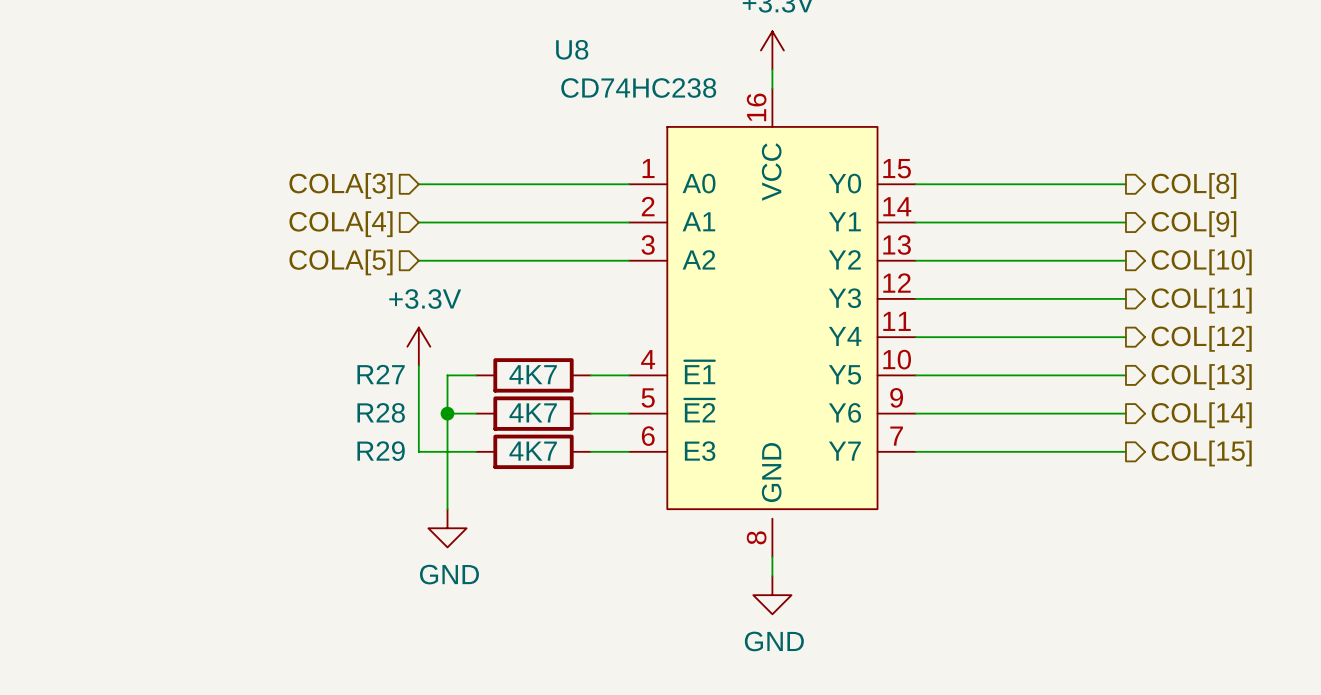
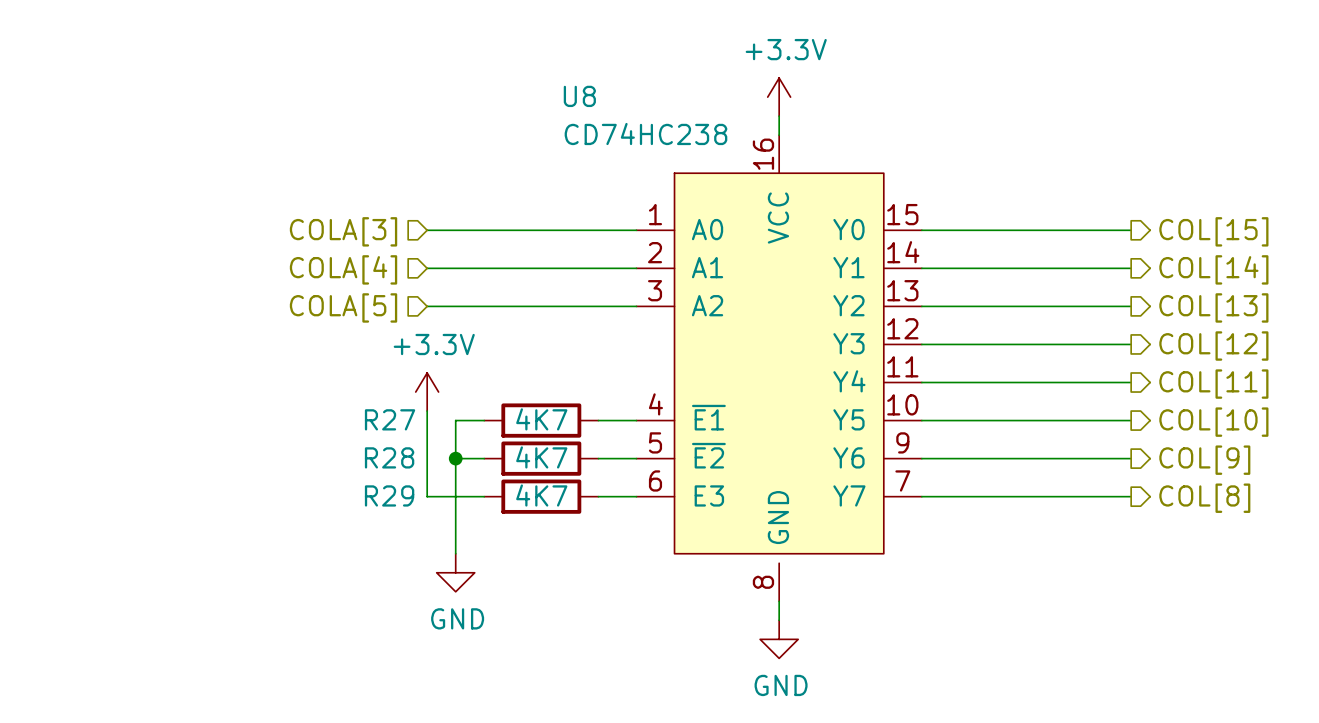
hierarchical label: COL[8] (1193, 185) -> COL[15] (1213, 231)
hierarchical label: COL[9] (1193, 224) -> COL[14] (1213, 269)
hierarchical label: COL[10] (1201, 262) -> COL[13] (1213, 307)
hierarchical label: COL[11] (1201, 300) -> COL[12] (1213, 346)
hierarchical label: COL[12] (1201, 338) -> COL[11] (1213, 384)
hierarchical label: COL[13] (1201, 377) -> COL[10] (1213, 422)
hierarchical label: COL[14] (1201, 415) -> COL[9] (1204, 460)
hierarchical label: COL[15] (1201, 453) -> COL[8] (1204, 498)

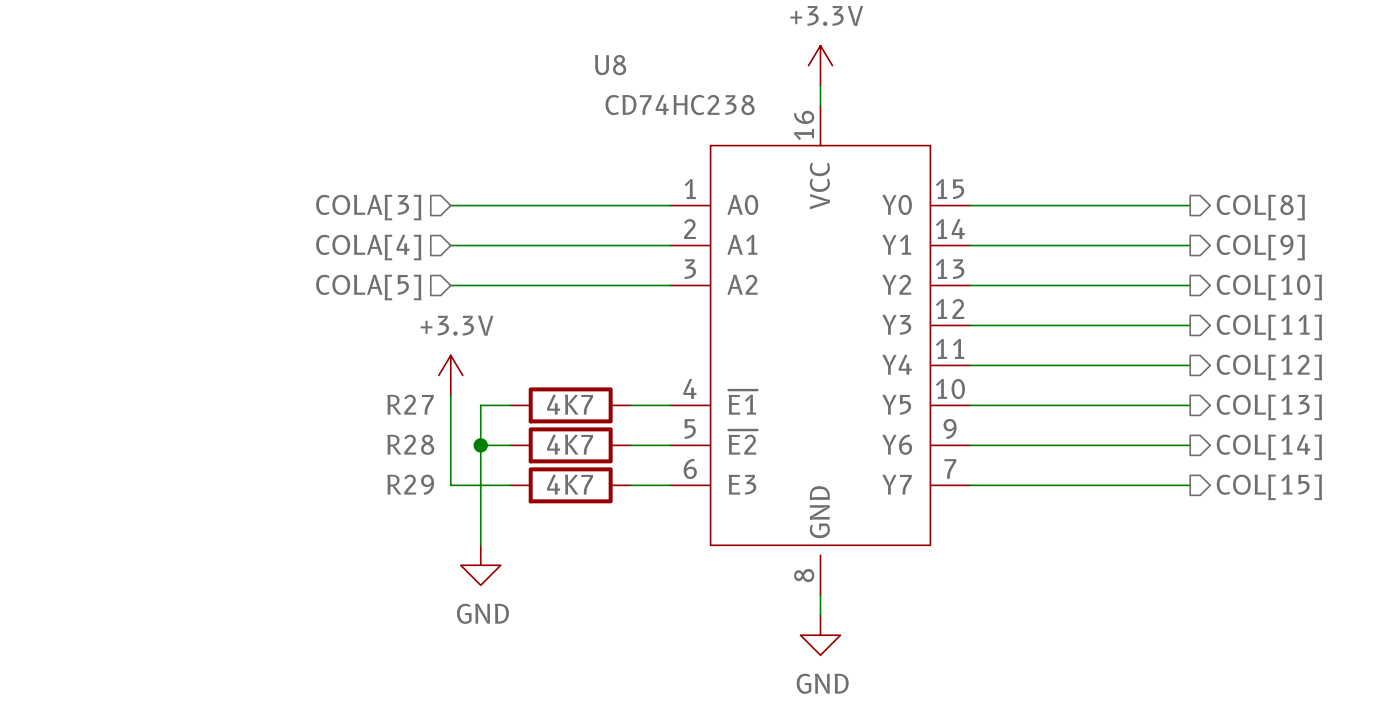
hierarchical label: COL[15] (1213, 231) -> COL[8] (1260, 207)
hierarchical label: COL[14] (1213, 269) -> COL[9] (1260, 247)
hierarchical label: COL[13] (1213, 307) -> COL[10] (1269, 287)
hierarchical label: COL[12] (1213, 346) -> COL[11] (1269, 327)
hierarchical label: COL[11] (1213, 384) -> COL[12] (1269, 367)
hierarchical label: COL[10] (1213, 422) -> COL[13] (1269, 407)
hierarchical label: COL[9] (1204, 460) -> COL[14] (1269, 447)
hierarchical label: COL[8] (1204, 498) -> COL[15] (1269, 487)

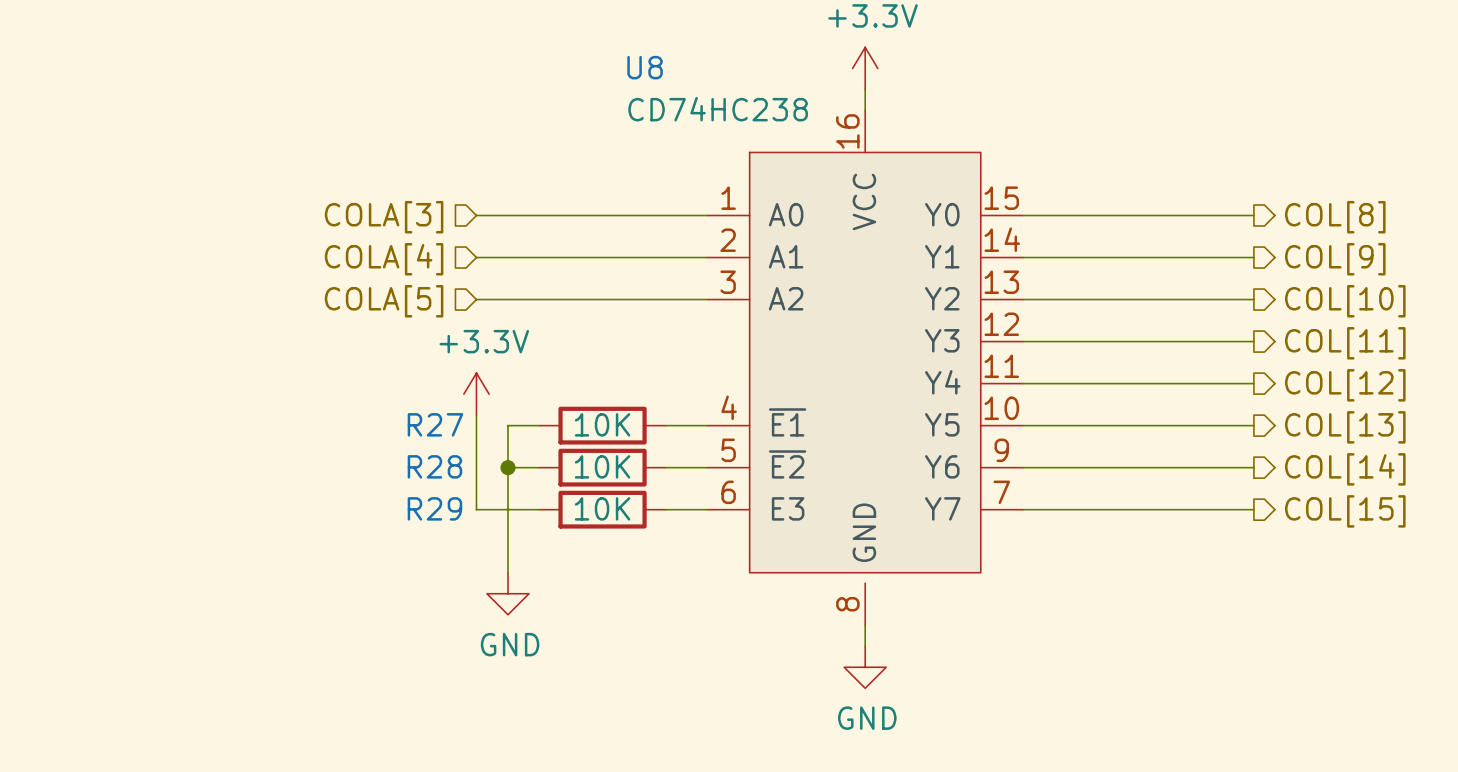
R27 value: 4K7 (570, 404) -> 10K (602, 424)
R28 value: 4K7 (570, 444) -> 10K (602, 466)
R29 value: 4K7 (570, 484) -> 10K (602, 508)

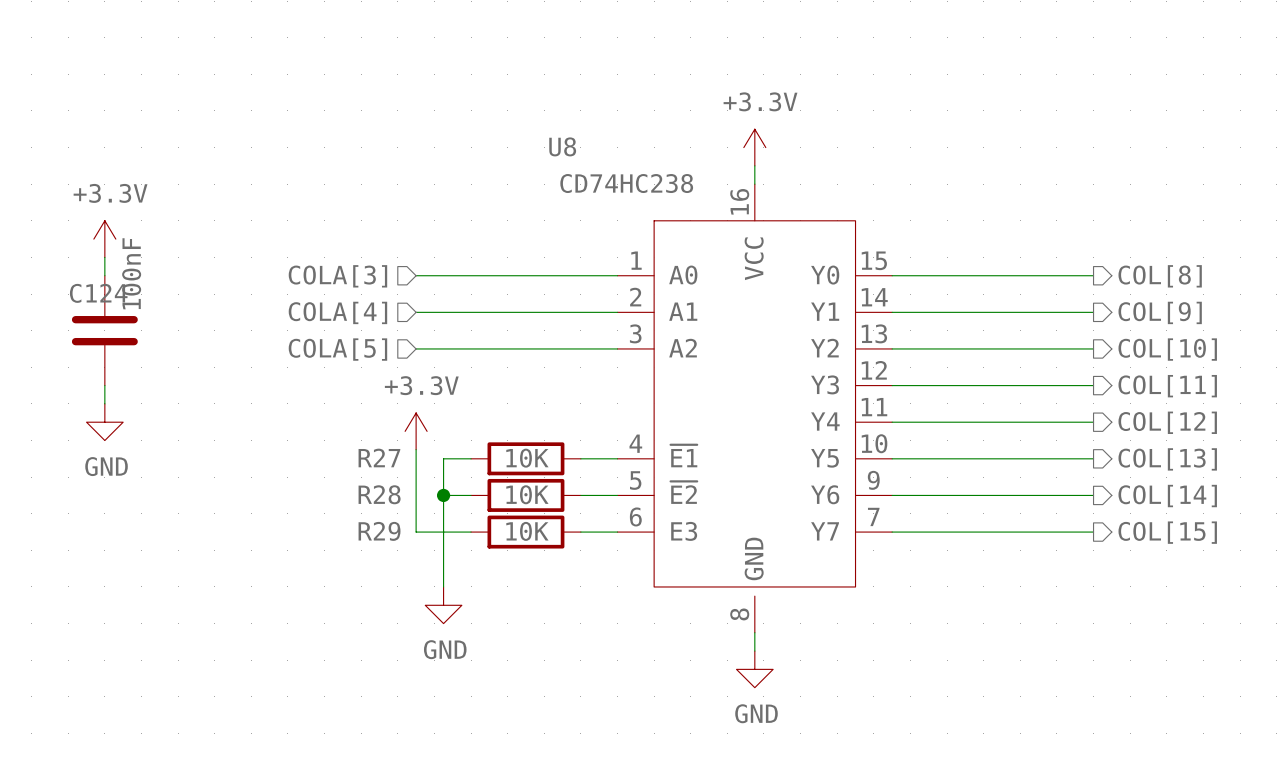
power symbol: none -> +3.3V (104, 239)
wire: none -> (104, 257) (104, 275)
C124: none -> 100nF (104, 330)
wire: none -> (104, 385) (104, 403)
power symbol: none -> GND (104, 422)

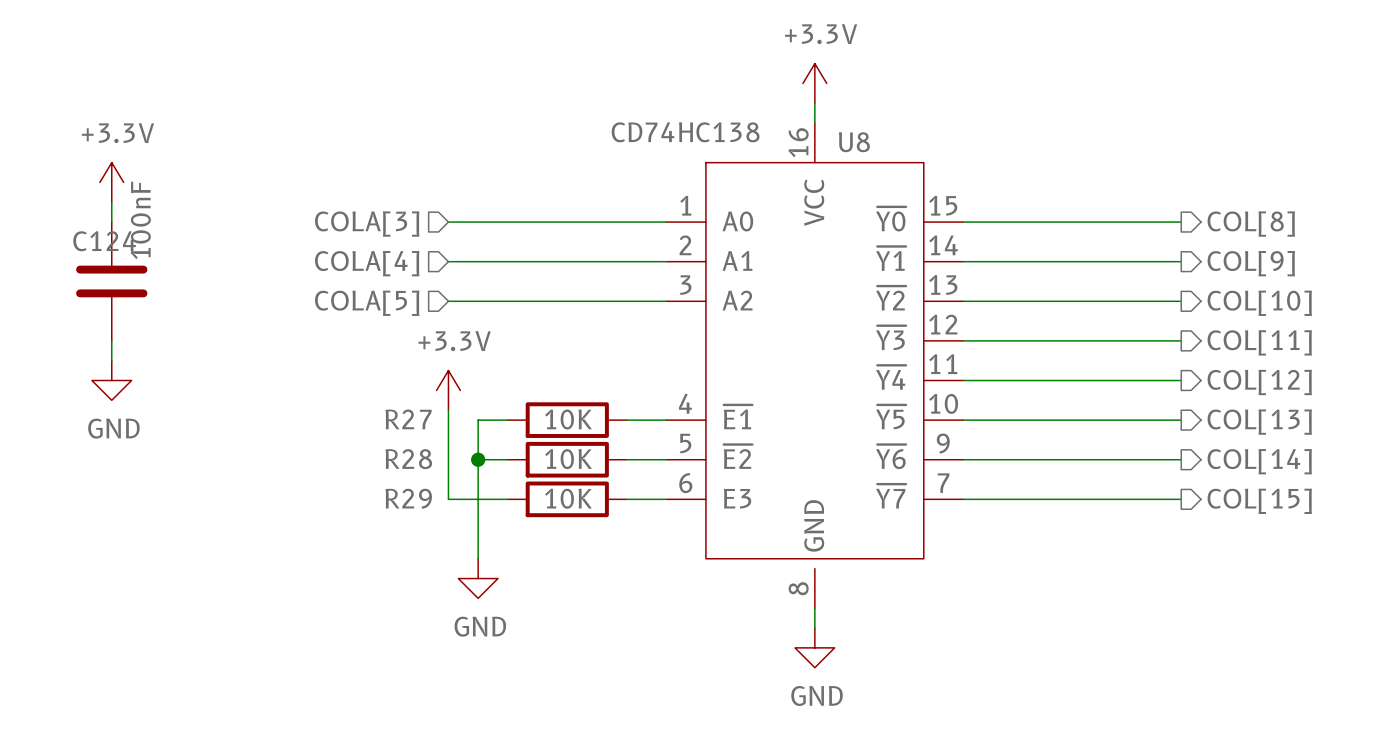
U8 name position: U8 (562, 146) -> U8 (854, 142)
U8 value: CD74HC238 (626, 183) -> CD74HC138 (685, 132)
U8 pin name: Y0 (825, 275) -> ~{Y0} (891, 219)
U8 pin name: Y1 (825, 311) -> ~{Y1} (891, 258)
U8 pin name: Y2 (824, 348) -> ~{Y2} (891, 298)
U8 pin name: Y3 (825, 384) -> ~{Y3} (891, 337)
U8 pin name: Y4 (825, 421) -> ~{Y4} (891, 377)
U8 pin name: Y5 (824, 458) -> ~{Y5} (891, 417)
U8 pin name: Y6 (825, 494) -> ~{Y6} (891, 456)
U8 pin name: Y7 (825, 531) -> ~{Y7} (891, 496)

